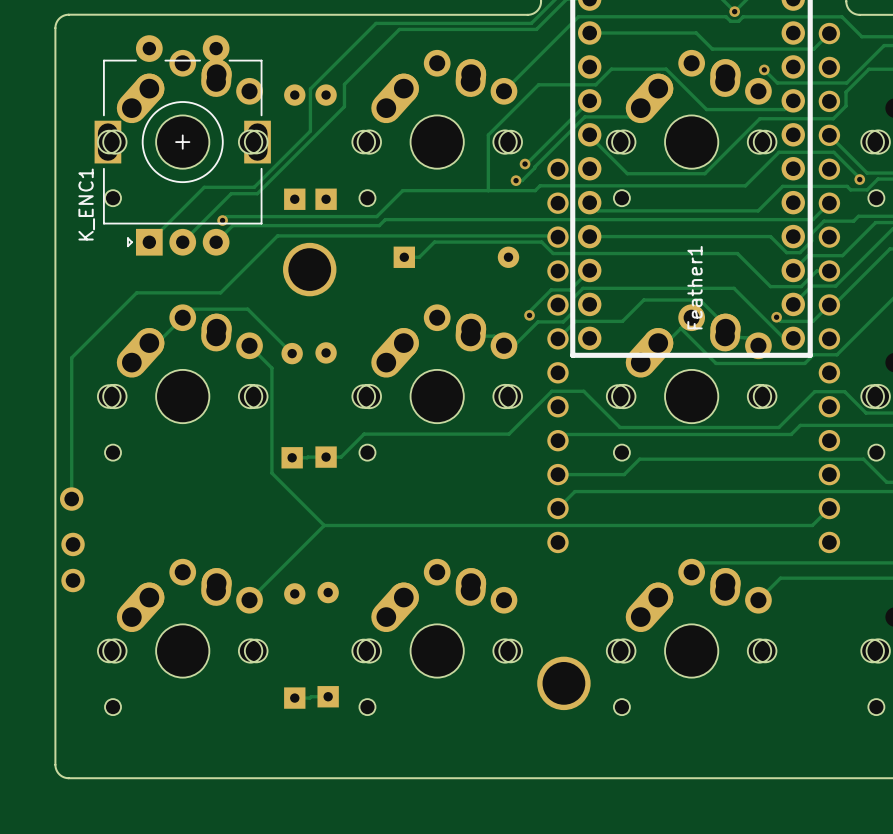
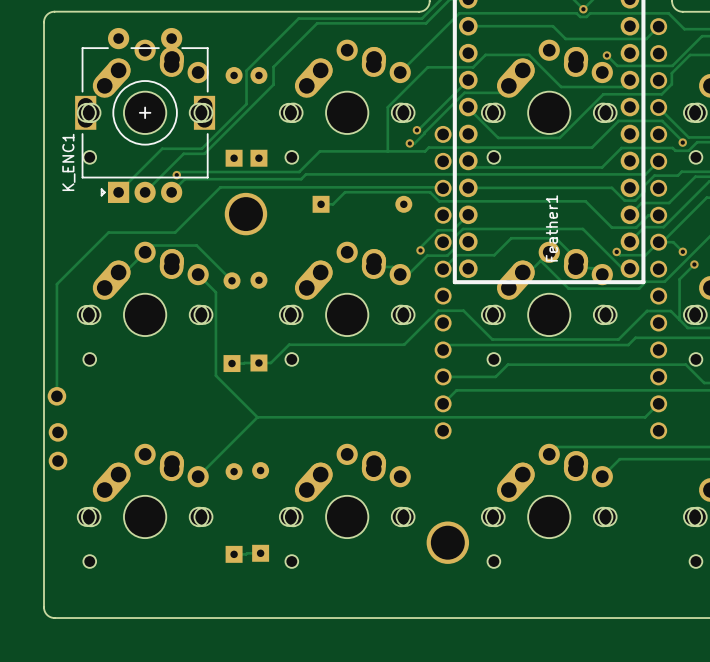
track: none -> (662, 242) (673, 242) (682, 251)
via: none -> (682, 251)
track: none -> (694, 264) (679, 279) (679, 319)
via: none -> (694, 264)

